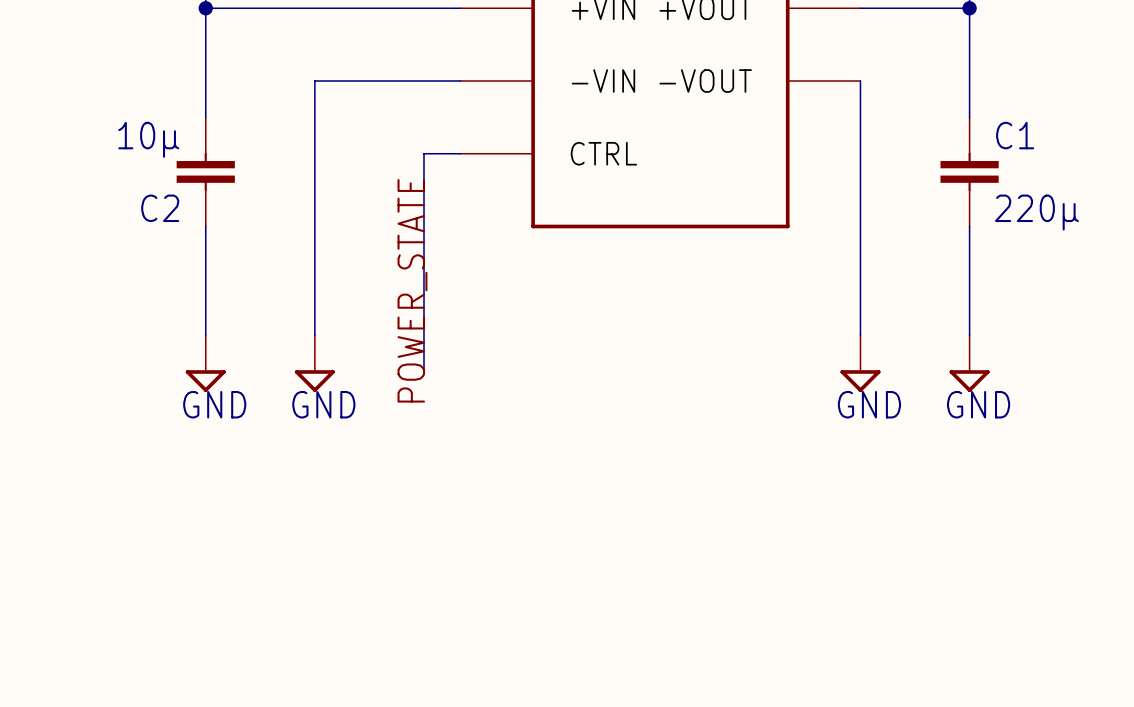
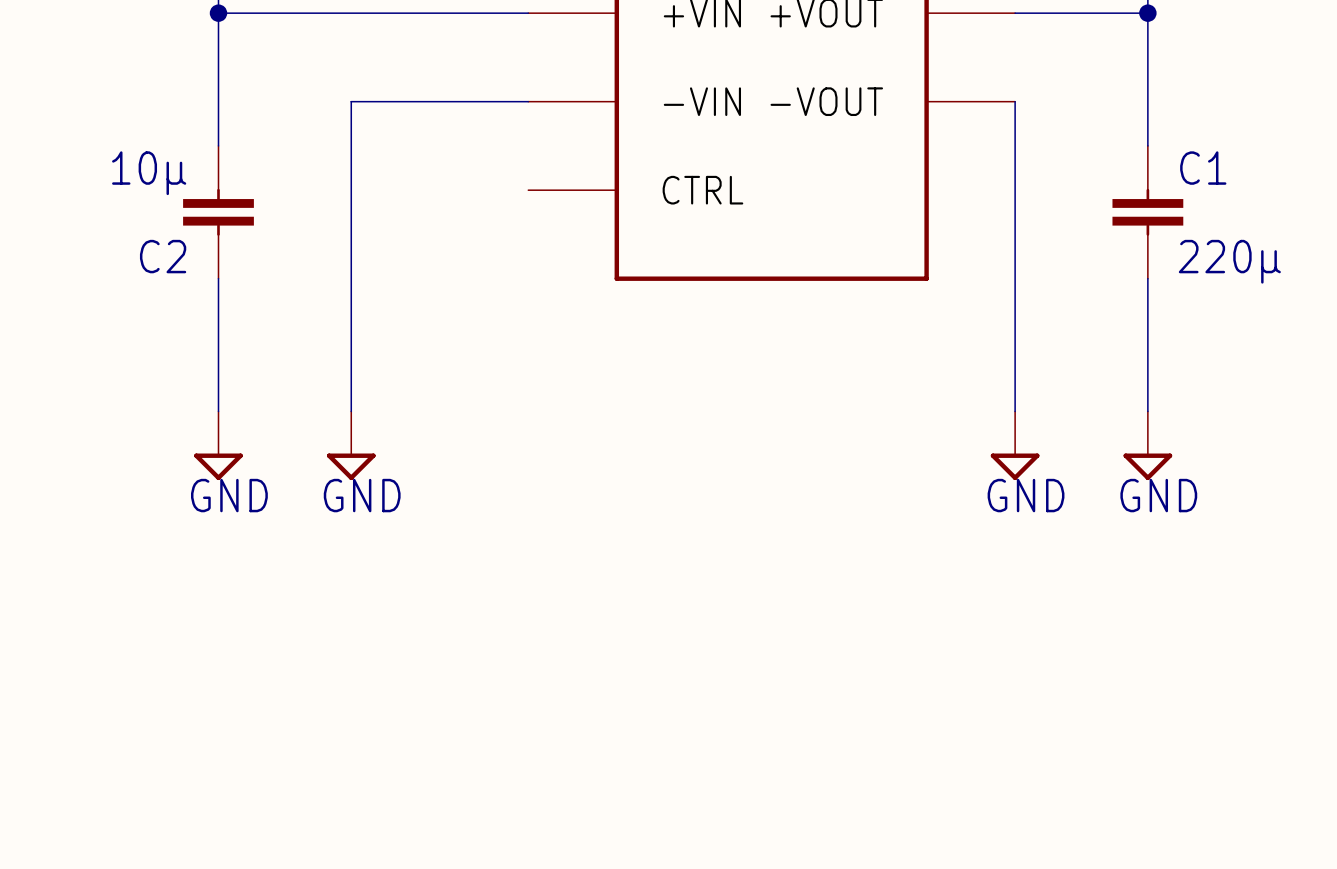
wire: (460, 153) (423, 153) (423, 371) -> none
label: POWER_STATE (412, 290) -> none

